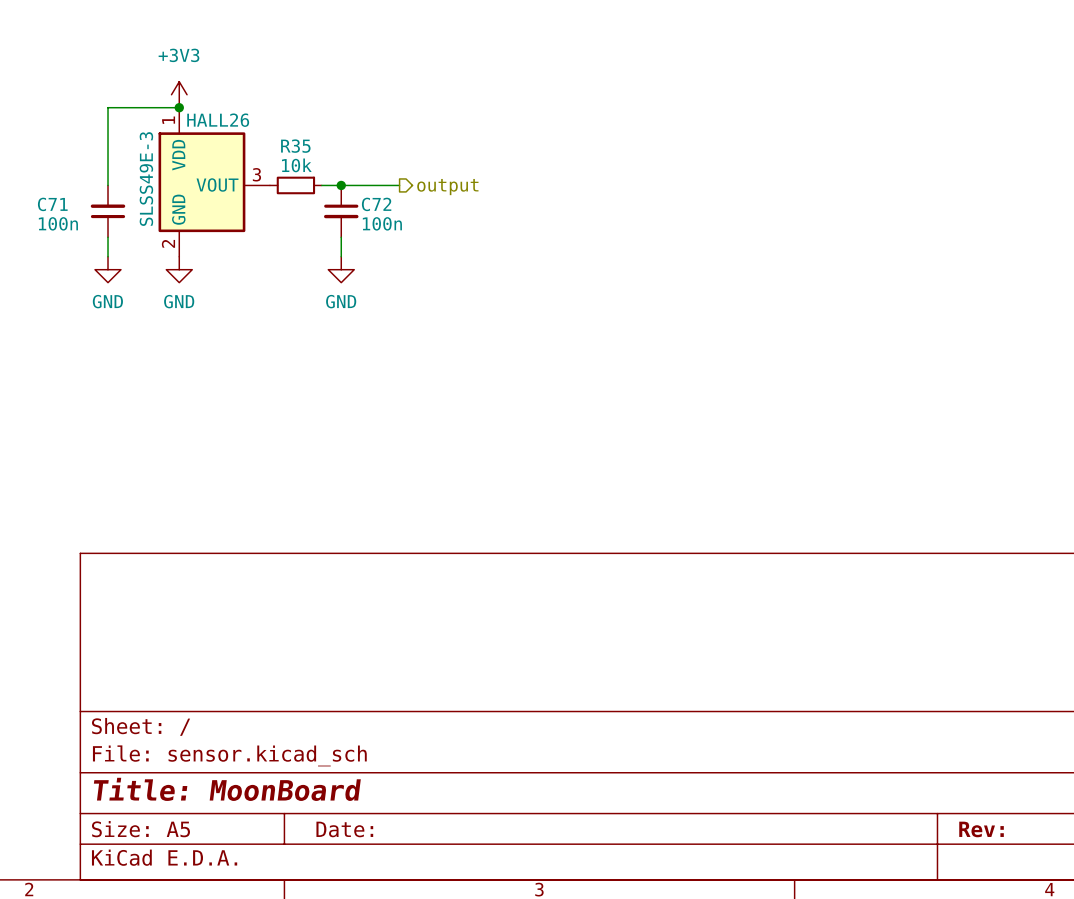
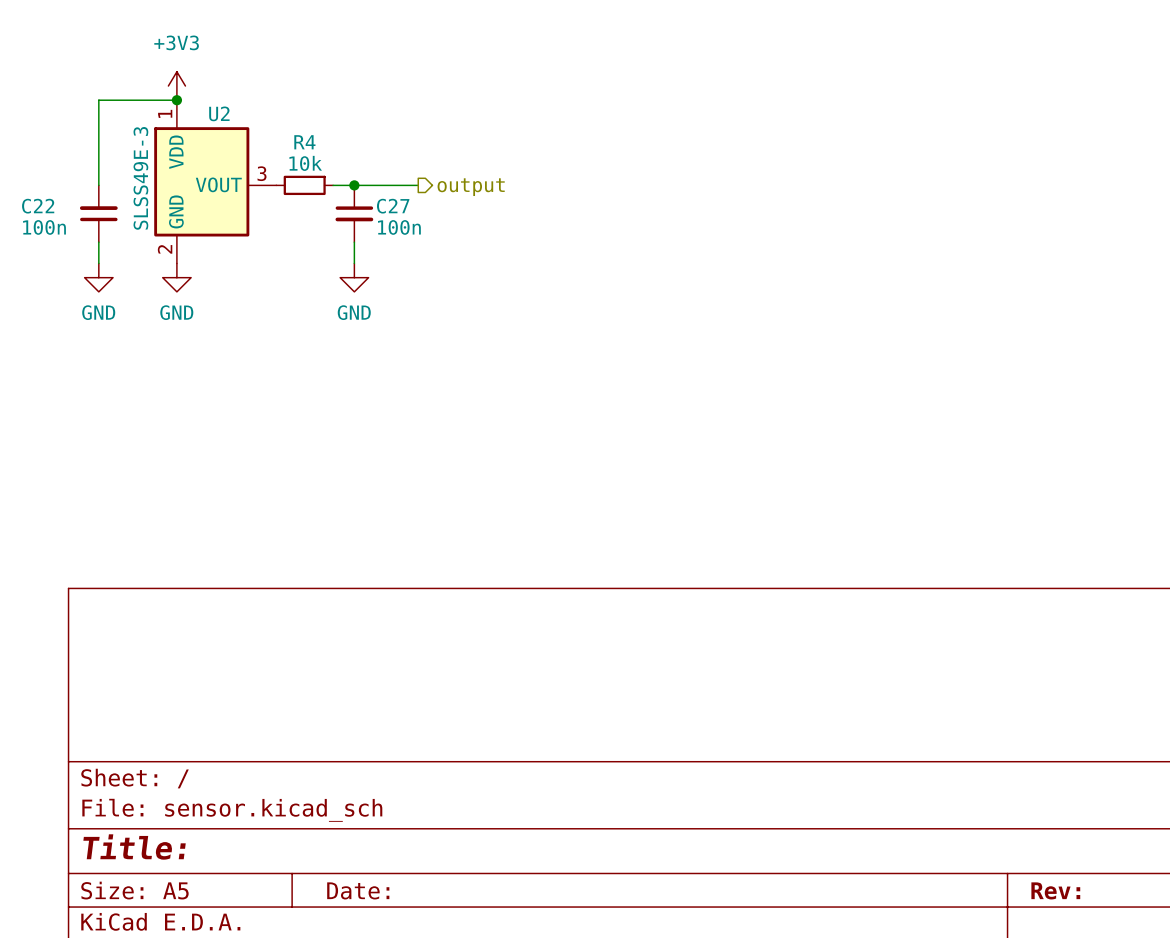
HALL26 name: HALL26 (218, 120) -> U2 (219, 113)
R35 name: R35 (295, 146) -> R4 (304, 142)
C71 name: C71 (52, 204) -> C22 (38, 206)
C72 name: C72 (376, 204) -> C27 (393, 206)
title block: Title: MoonBoard (227, 789) -> Title: (134, 846)

